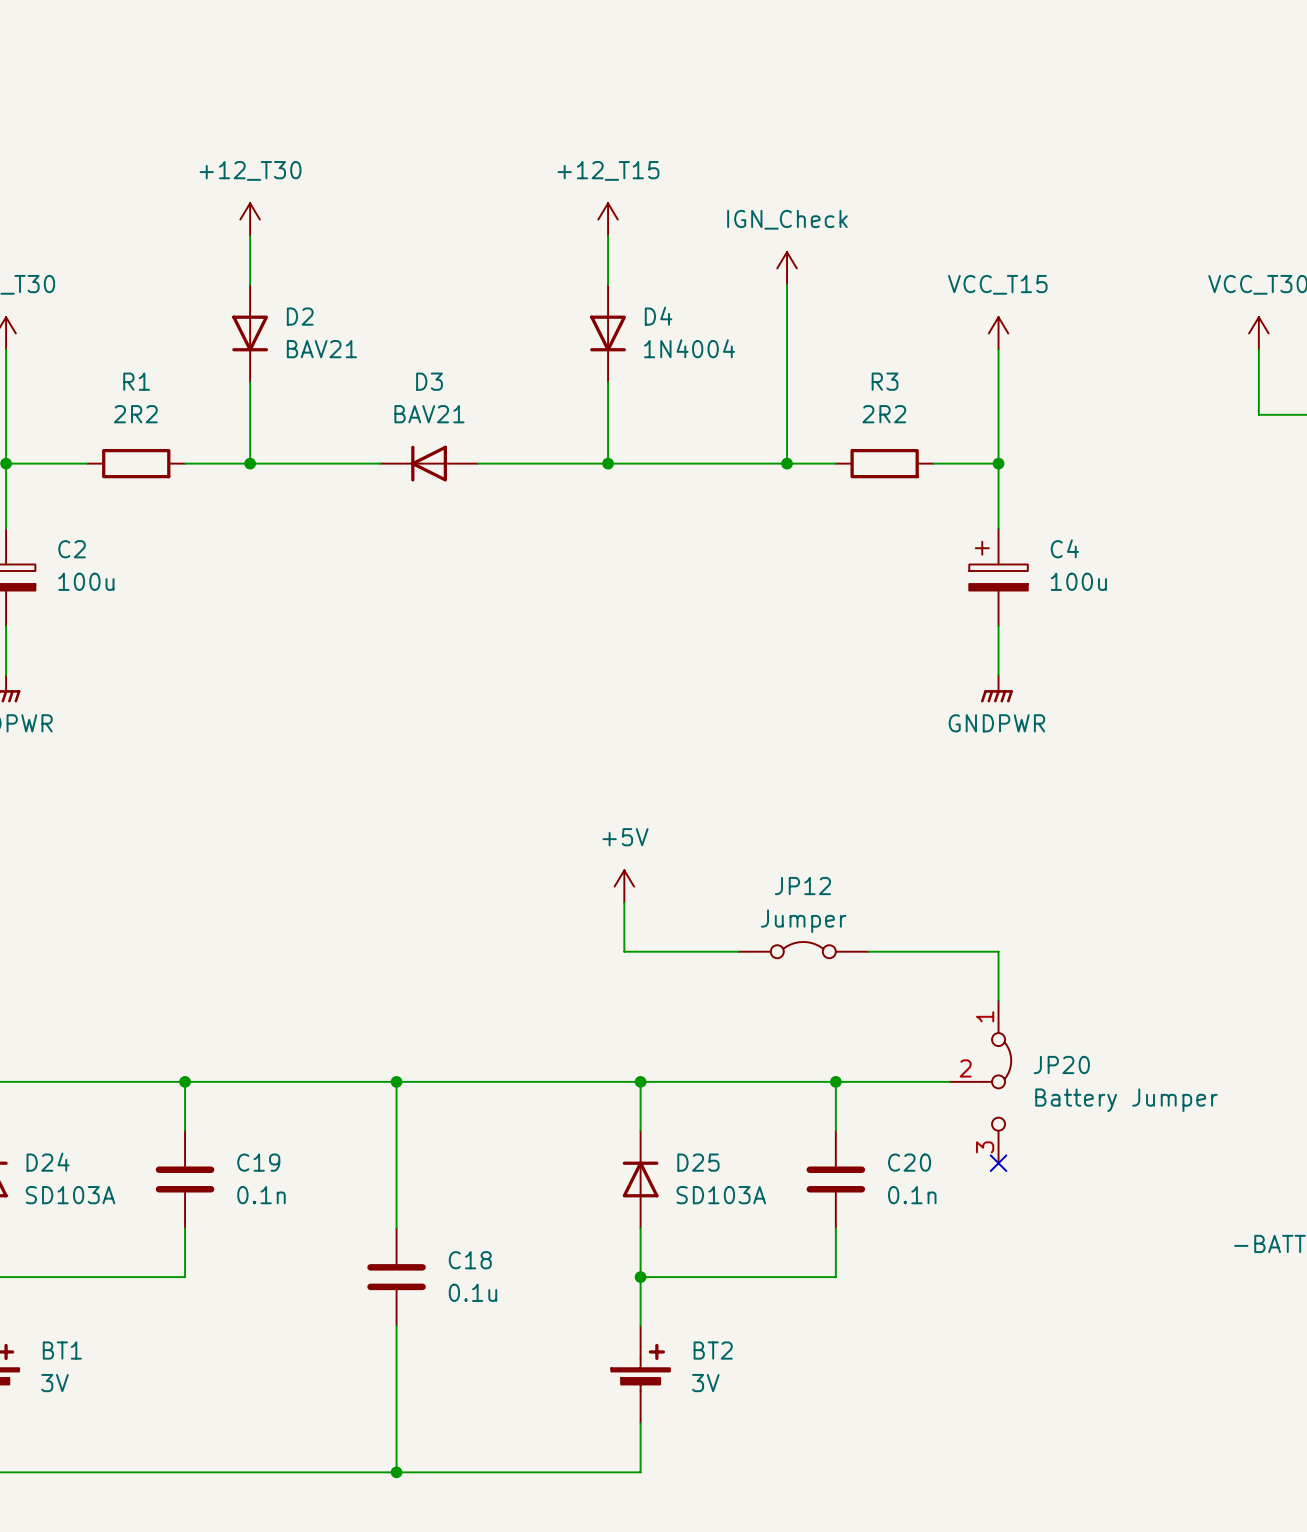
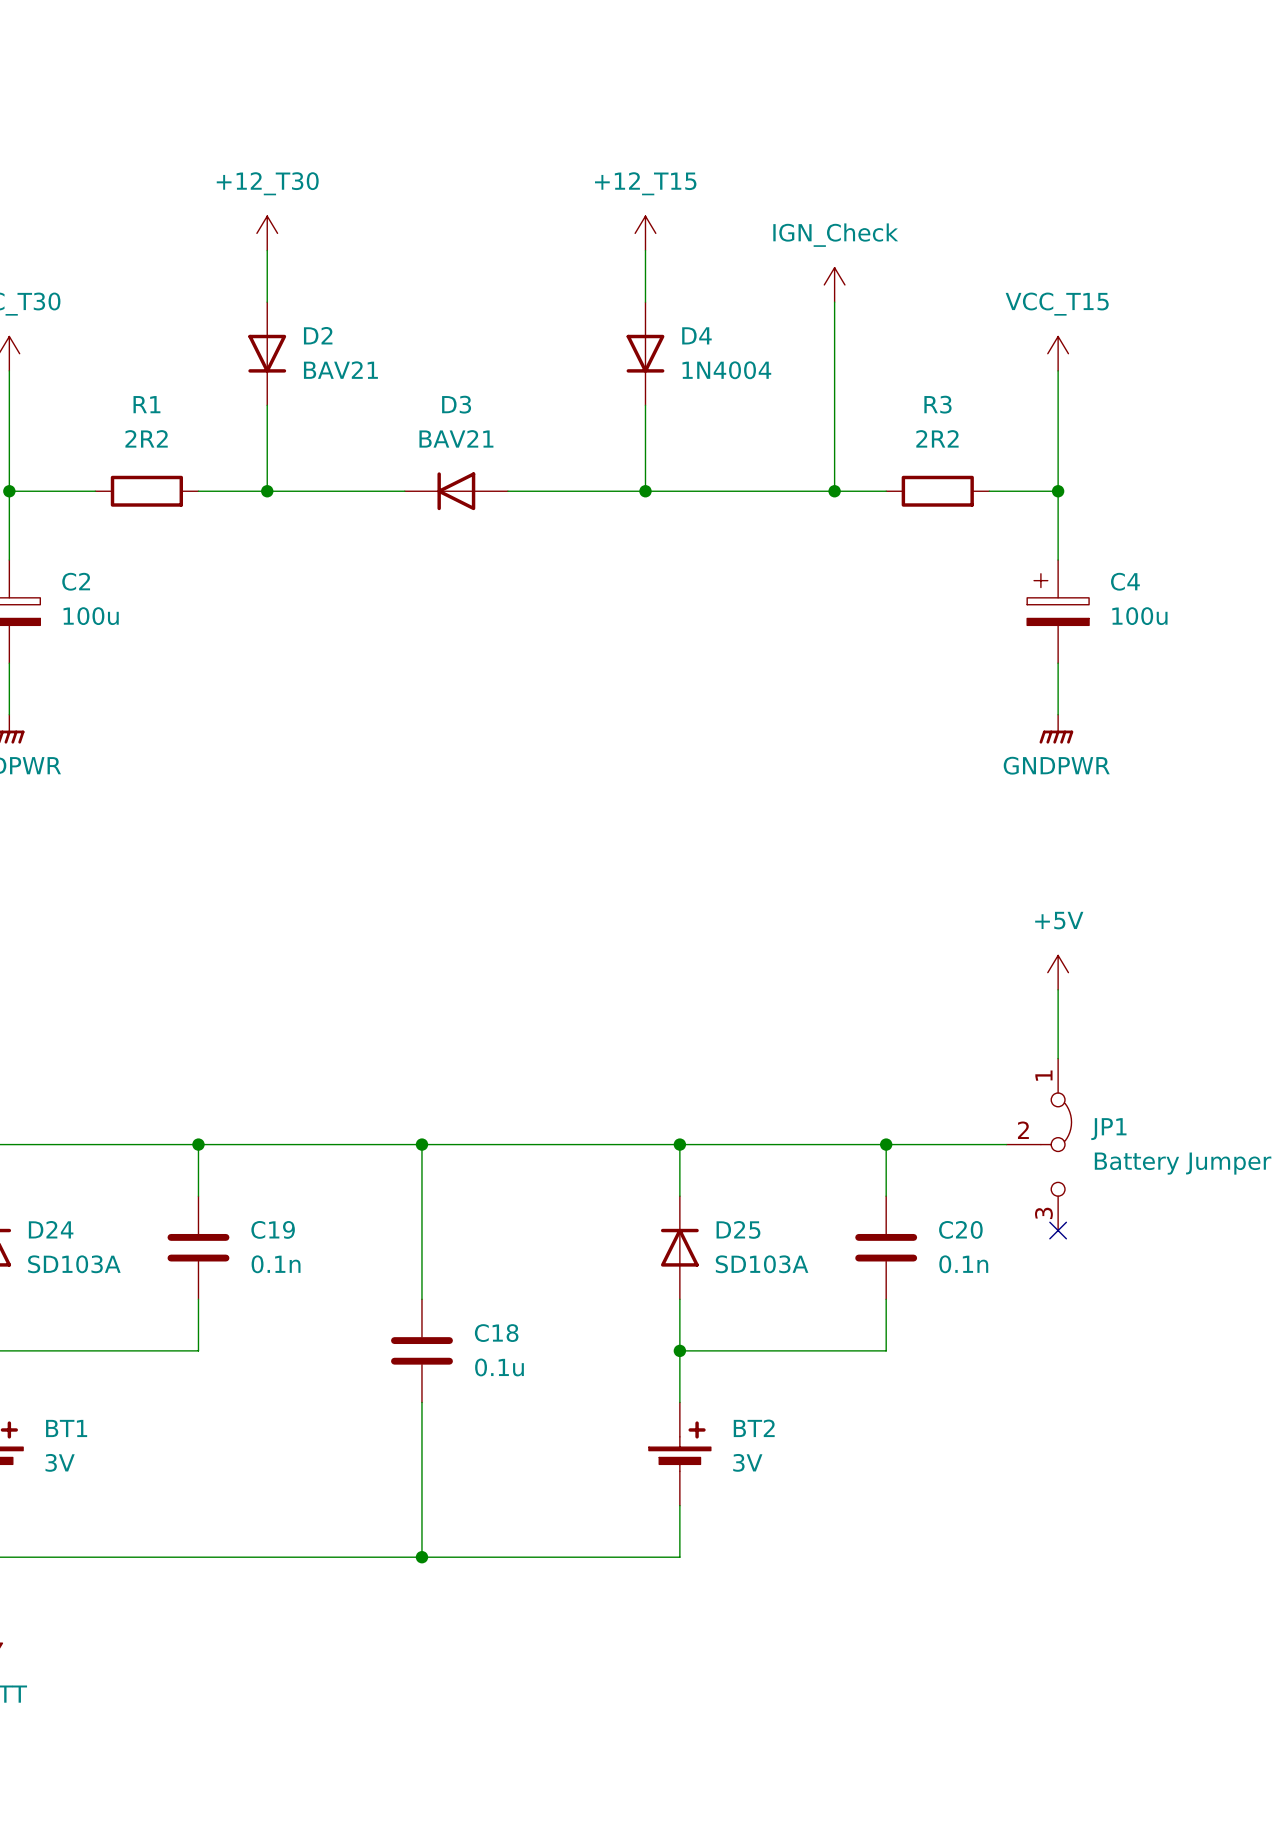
power symbol: +5V (624, 886) -> none
wire: (624, 902) (624, 951) (738, 951) -> none
power symbol: none -> +5V (1058, 972)
JP12: Jumper (803, 950) -> none
wire: (868, 951) (998, 951) -> (1058, 989) (1058, 1007)
JP20 name: JP20 (1061, 1064) -> JP1 (1108, 1129)

